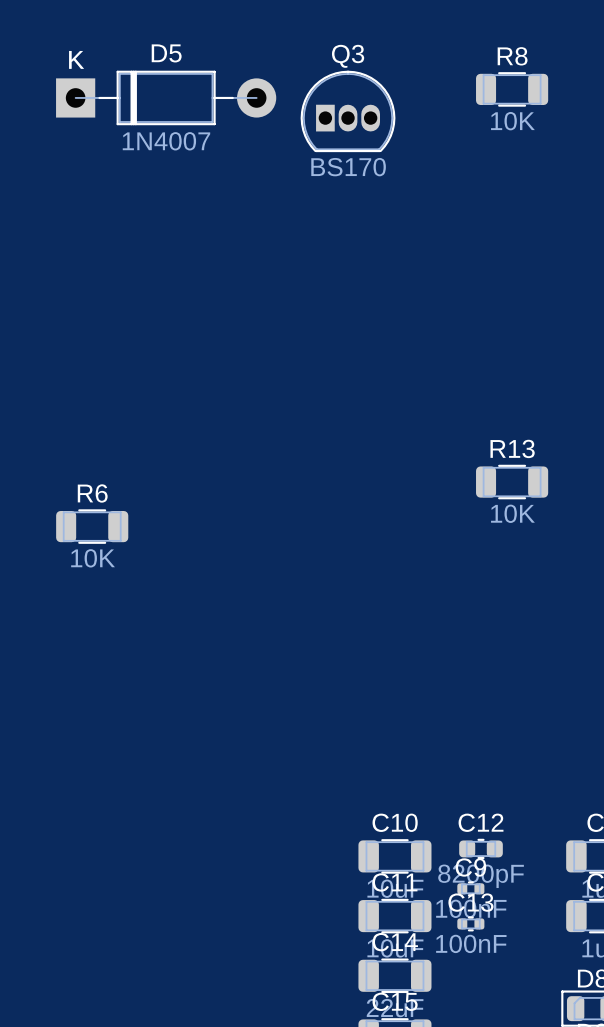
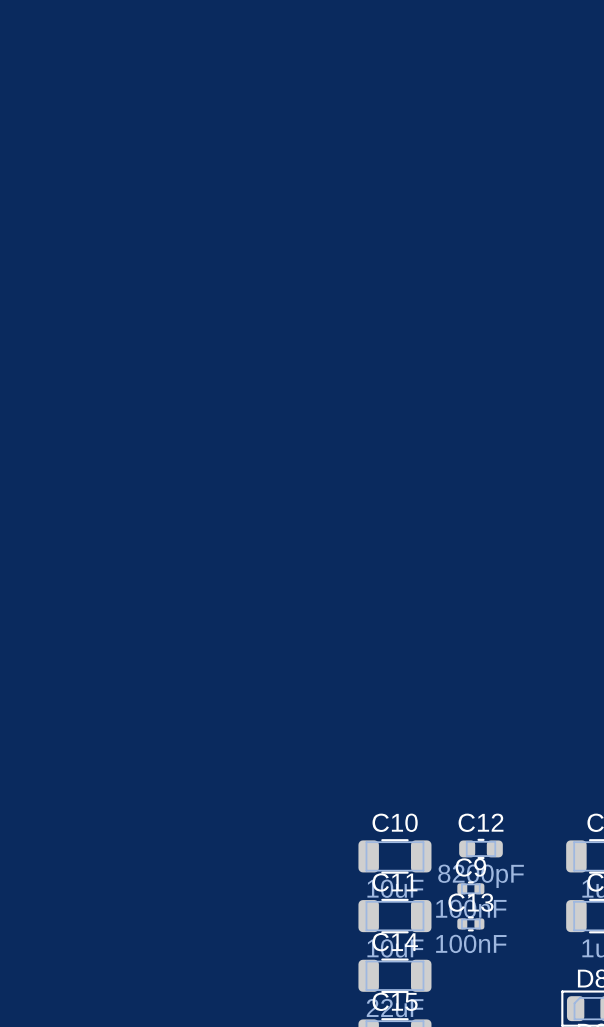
R8: 10K (512, 89) -> none
D5: 1N4007 (166, 97) -> none
Q3: BS170 (348, 111) -> none
R13: 10K (512, 482) -> none
R6: 10K (92, 526) -> none

